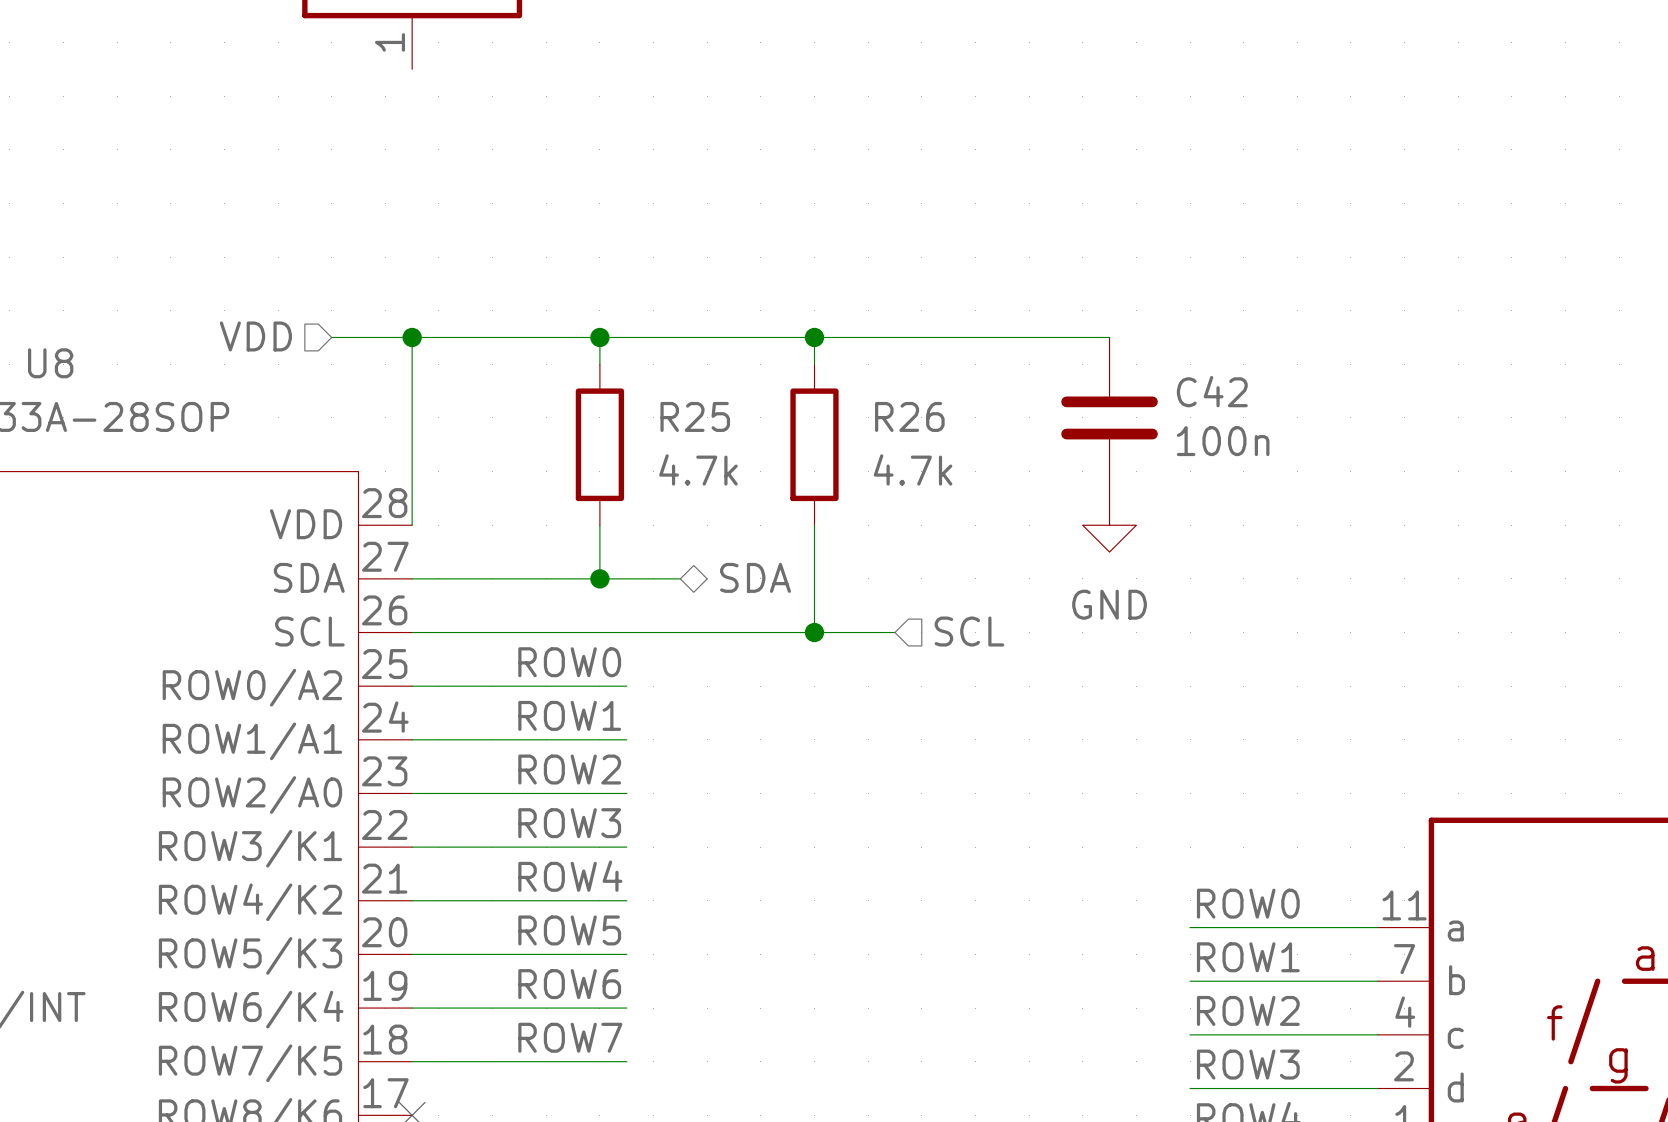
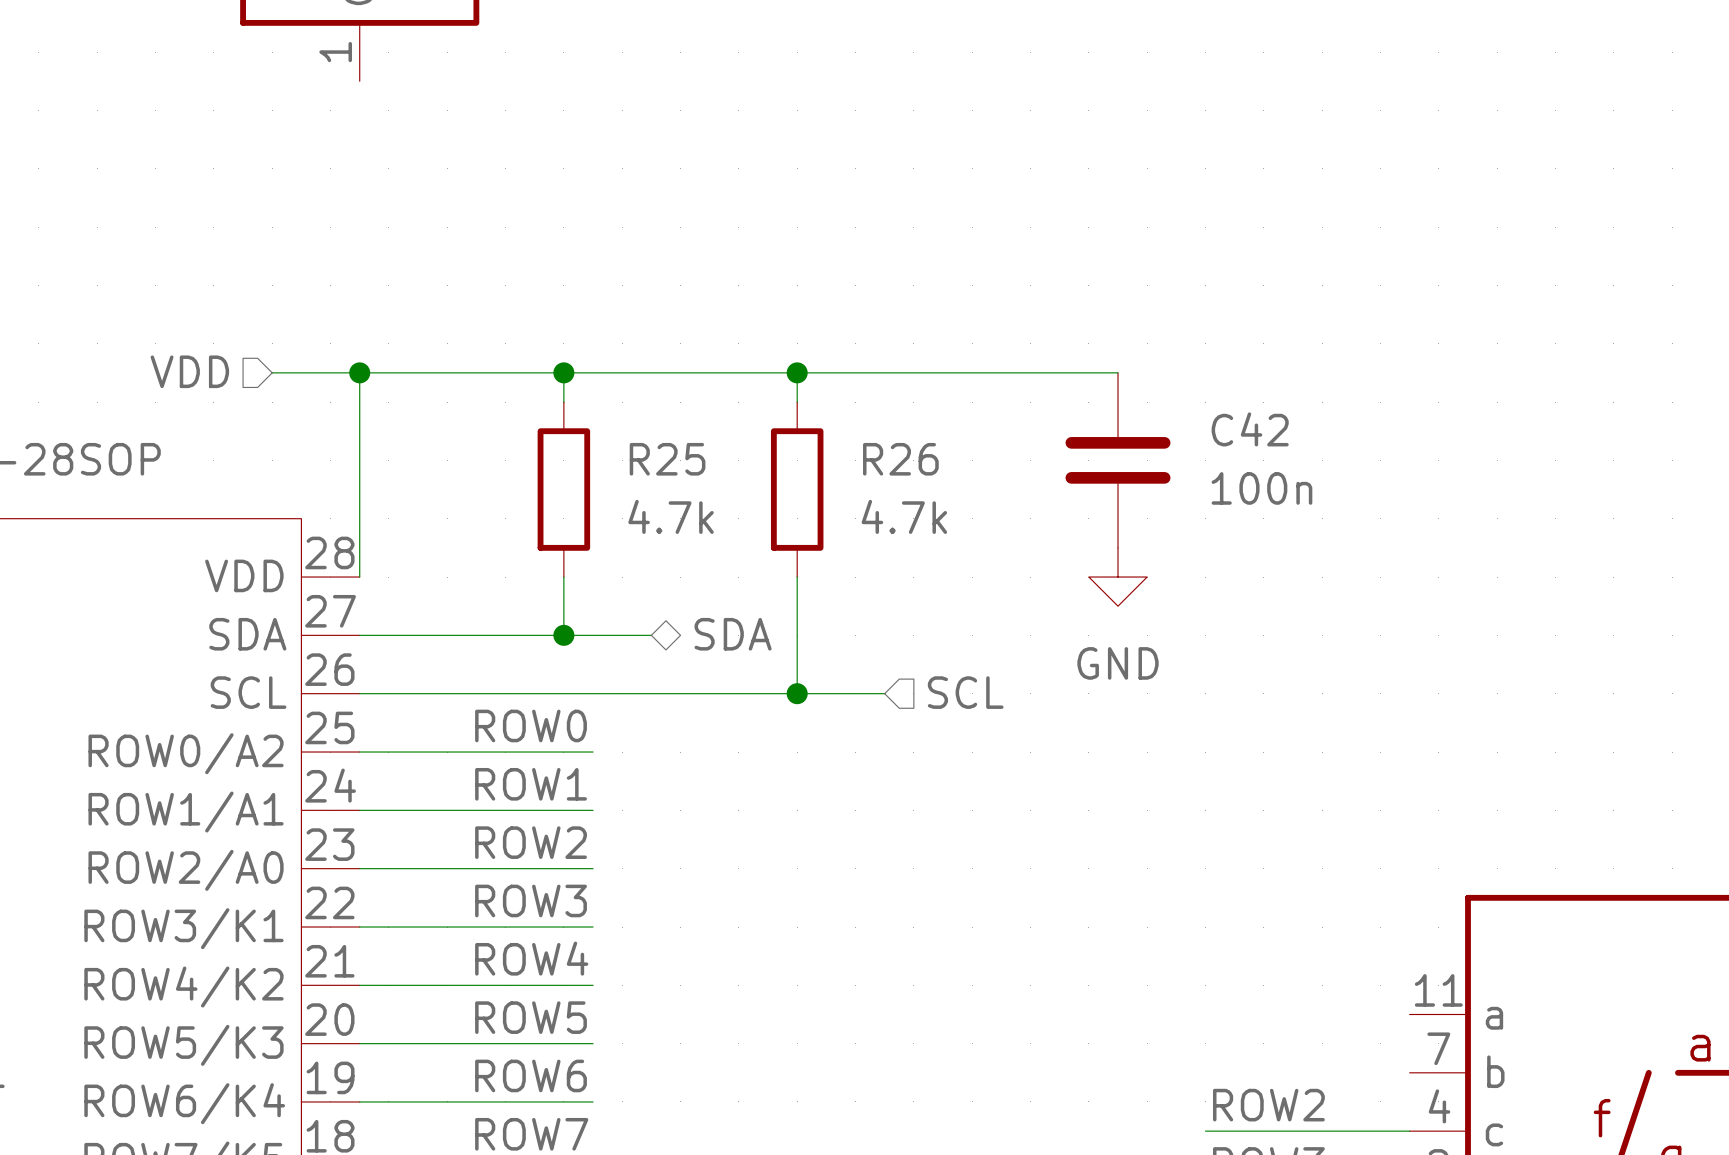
C42 name position: C42 (1212, 391) -> C42 (1250, 429)
C42 value position: 100n (1223, 441) -> 100n (1261, 488)
label: ROW0 (1248, 903) -> none
wire: (1190, 927) (1377, 927) -> none
label: ROW1 (1248, 957) -> none
wire: (1190, 981) (1377, 981) -> none

